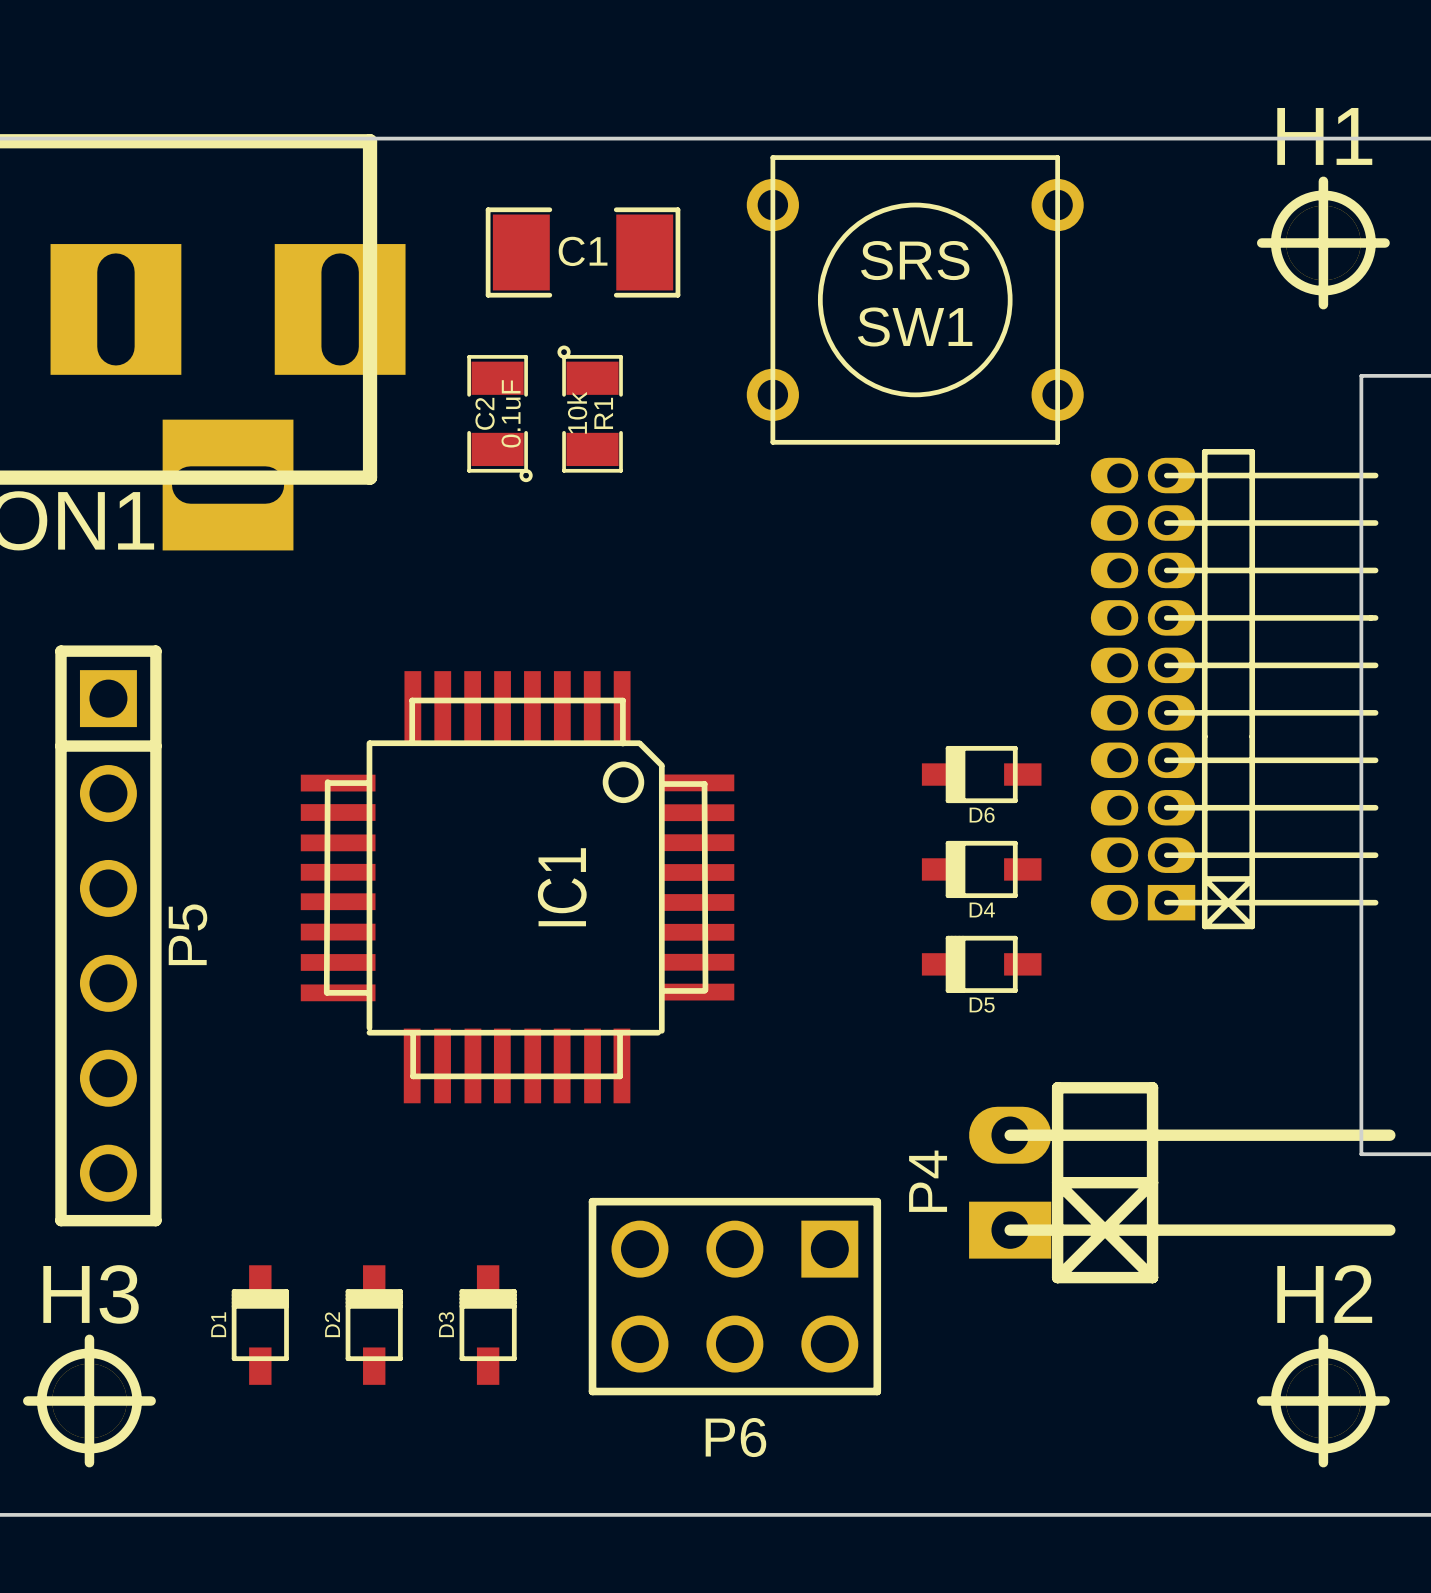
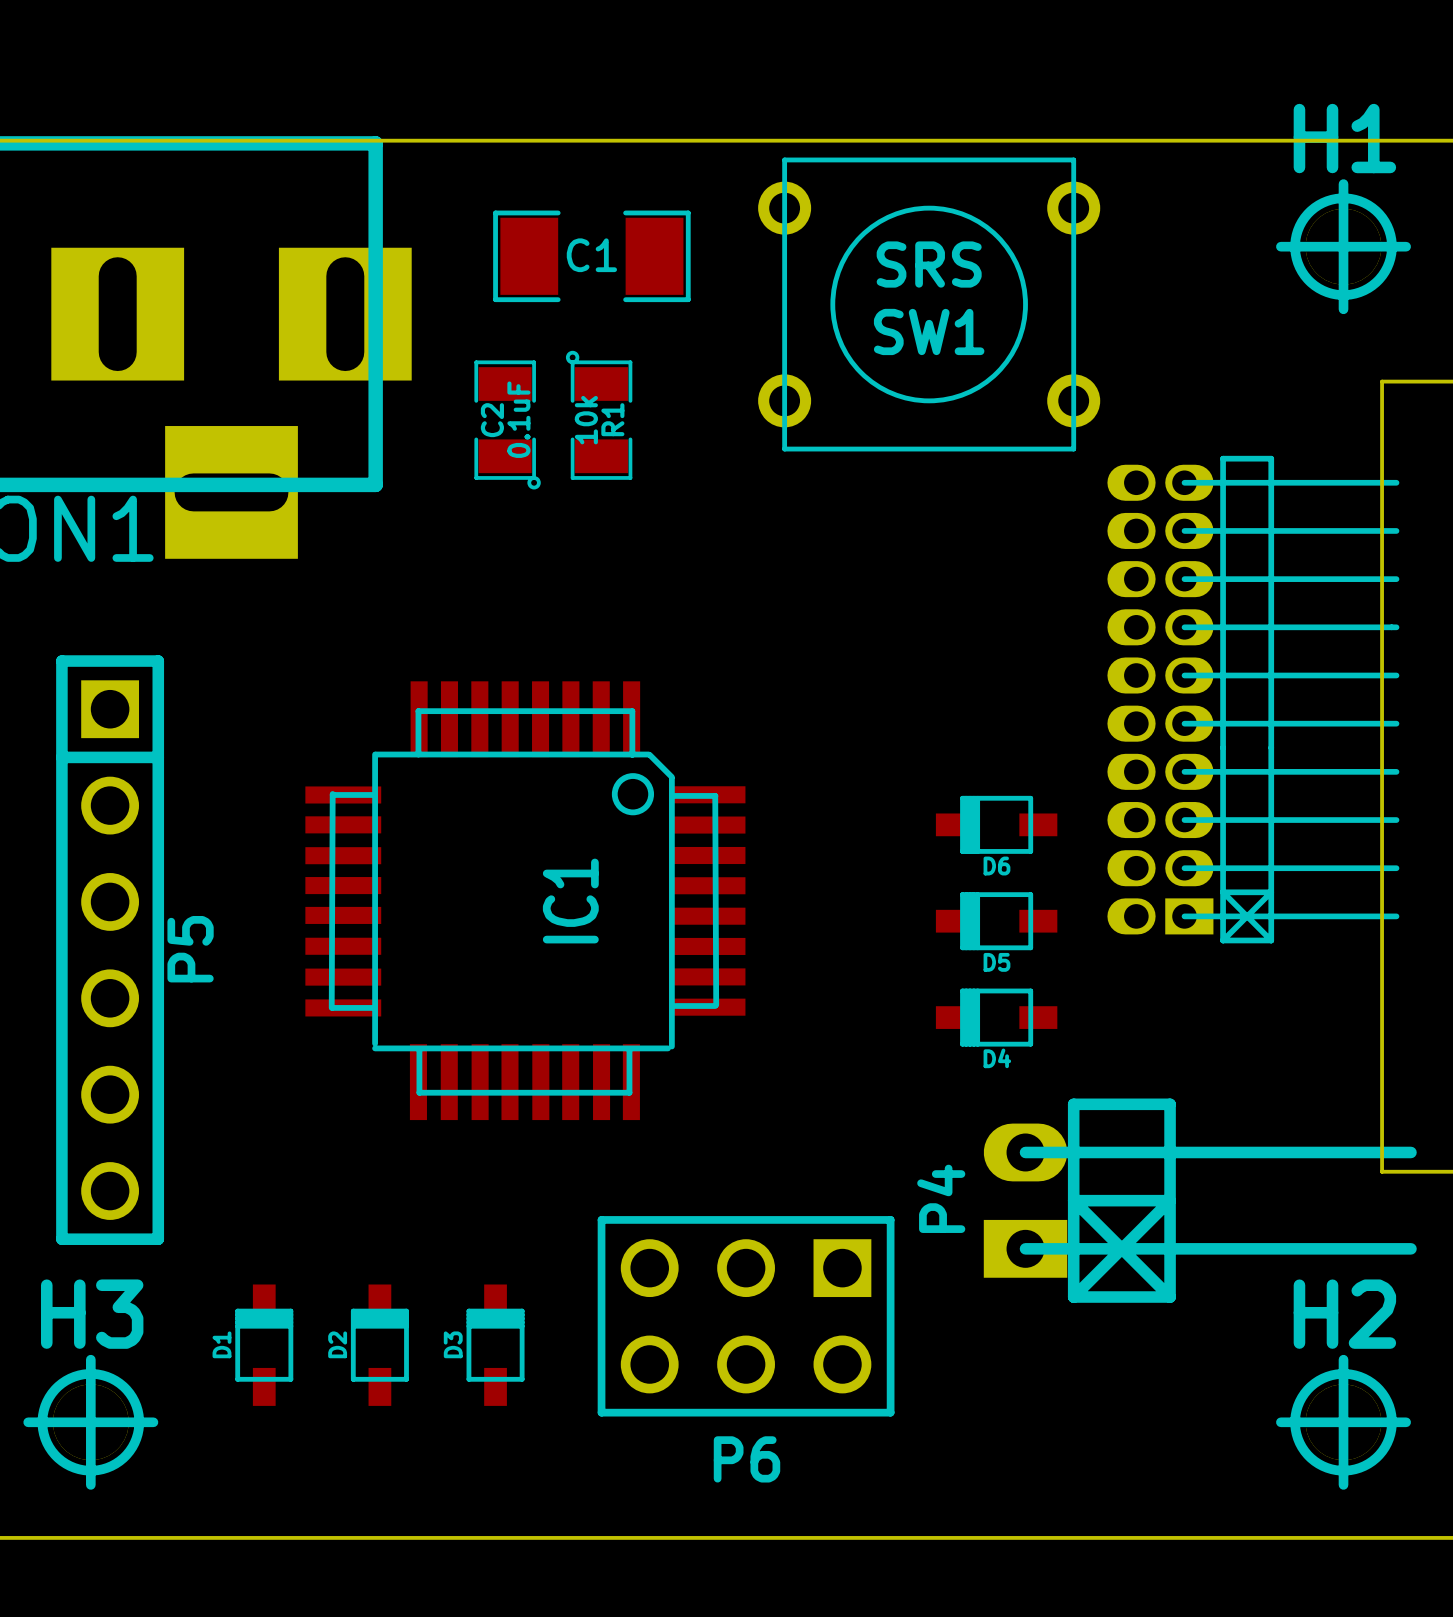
D6 position: (981, 774) -> (996, 824)
D4 position: (981, 869) -> (996, 1017)
D5 position: (981, 964) -> (996, 921)

